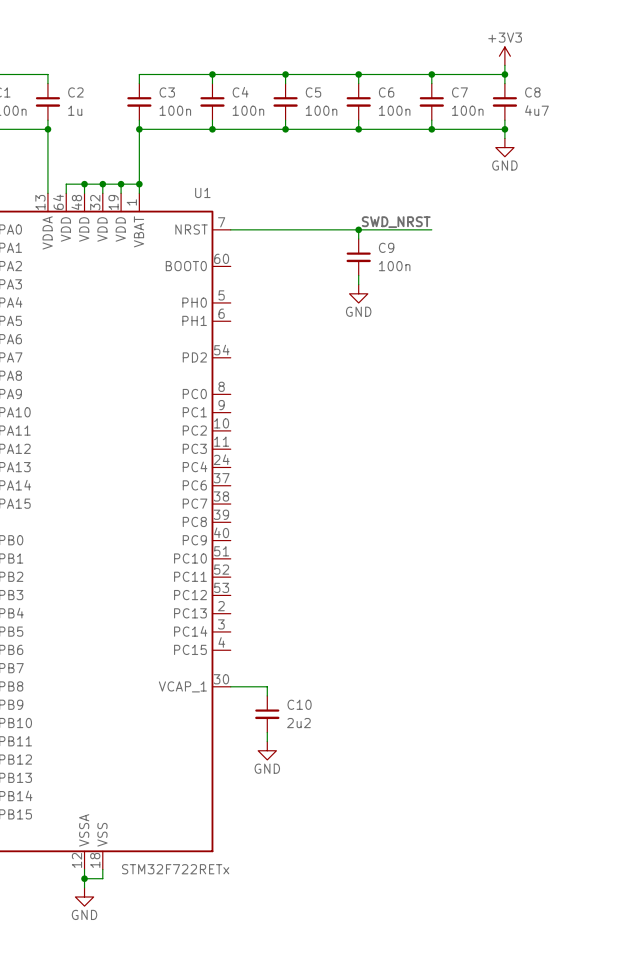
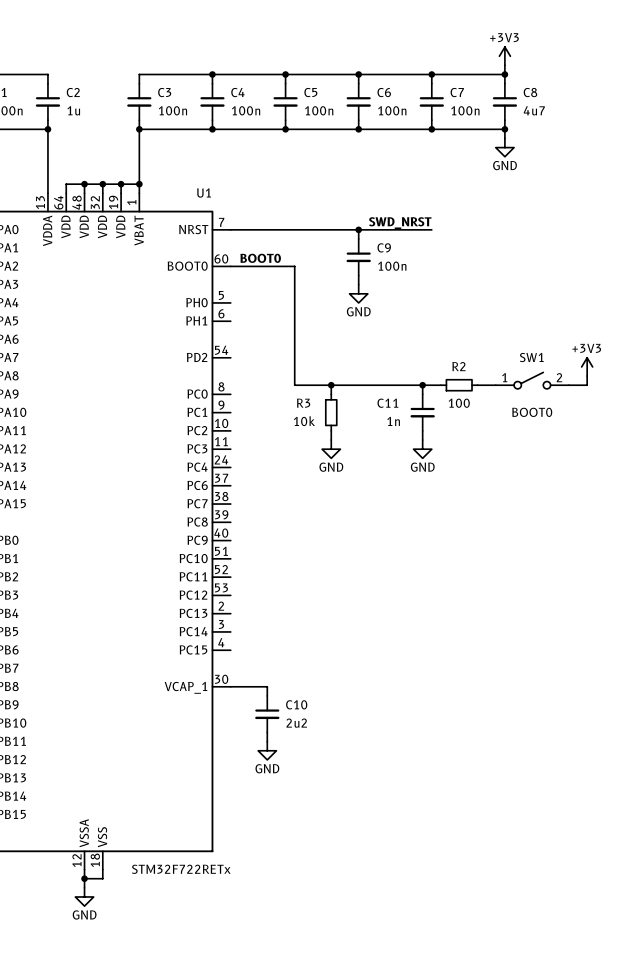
label: none -> BOOT0 (260, 258)
wire: none -> (230, 266) (294, 266) (294, 385) (440, 385)
power symbol: none -> +3V3 (587, 366)
wire: none -> (587, 376) (587, 385) (568, 385)
SW1: none -> BOOT0 (532, 380)
wire: none -> (331, 385) (331, 394)
junction: none -> (331, 385)
wire: none -> (422, 385) (422, 394)
junction: none -> (422, 385)
R2: none -> 100 (459, 385)
wire: none -> (477, 385) (495, 385)
R3: none -> 10k (331, 412)
C11: none -> 1n (422, 412)
wire: none -> (331, 430) (331, 440)
wire: none -> (422, 430) (422, 440)
power symbol: none -> GND (331, 449)
power symbol: none -> GND (422, 449)

